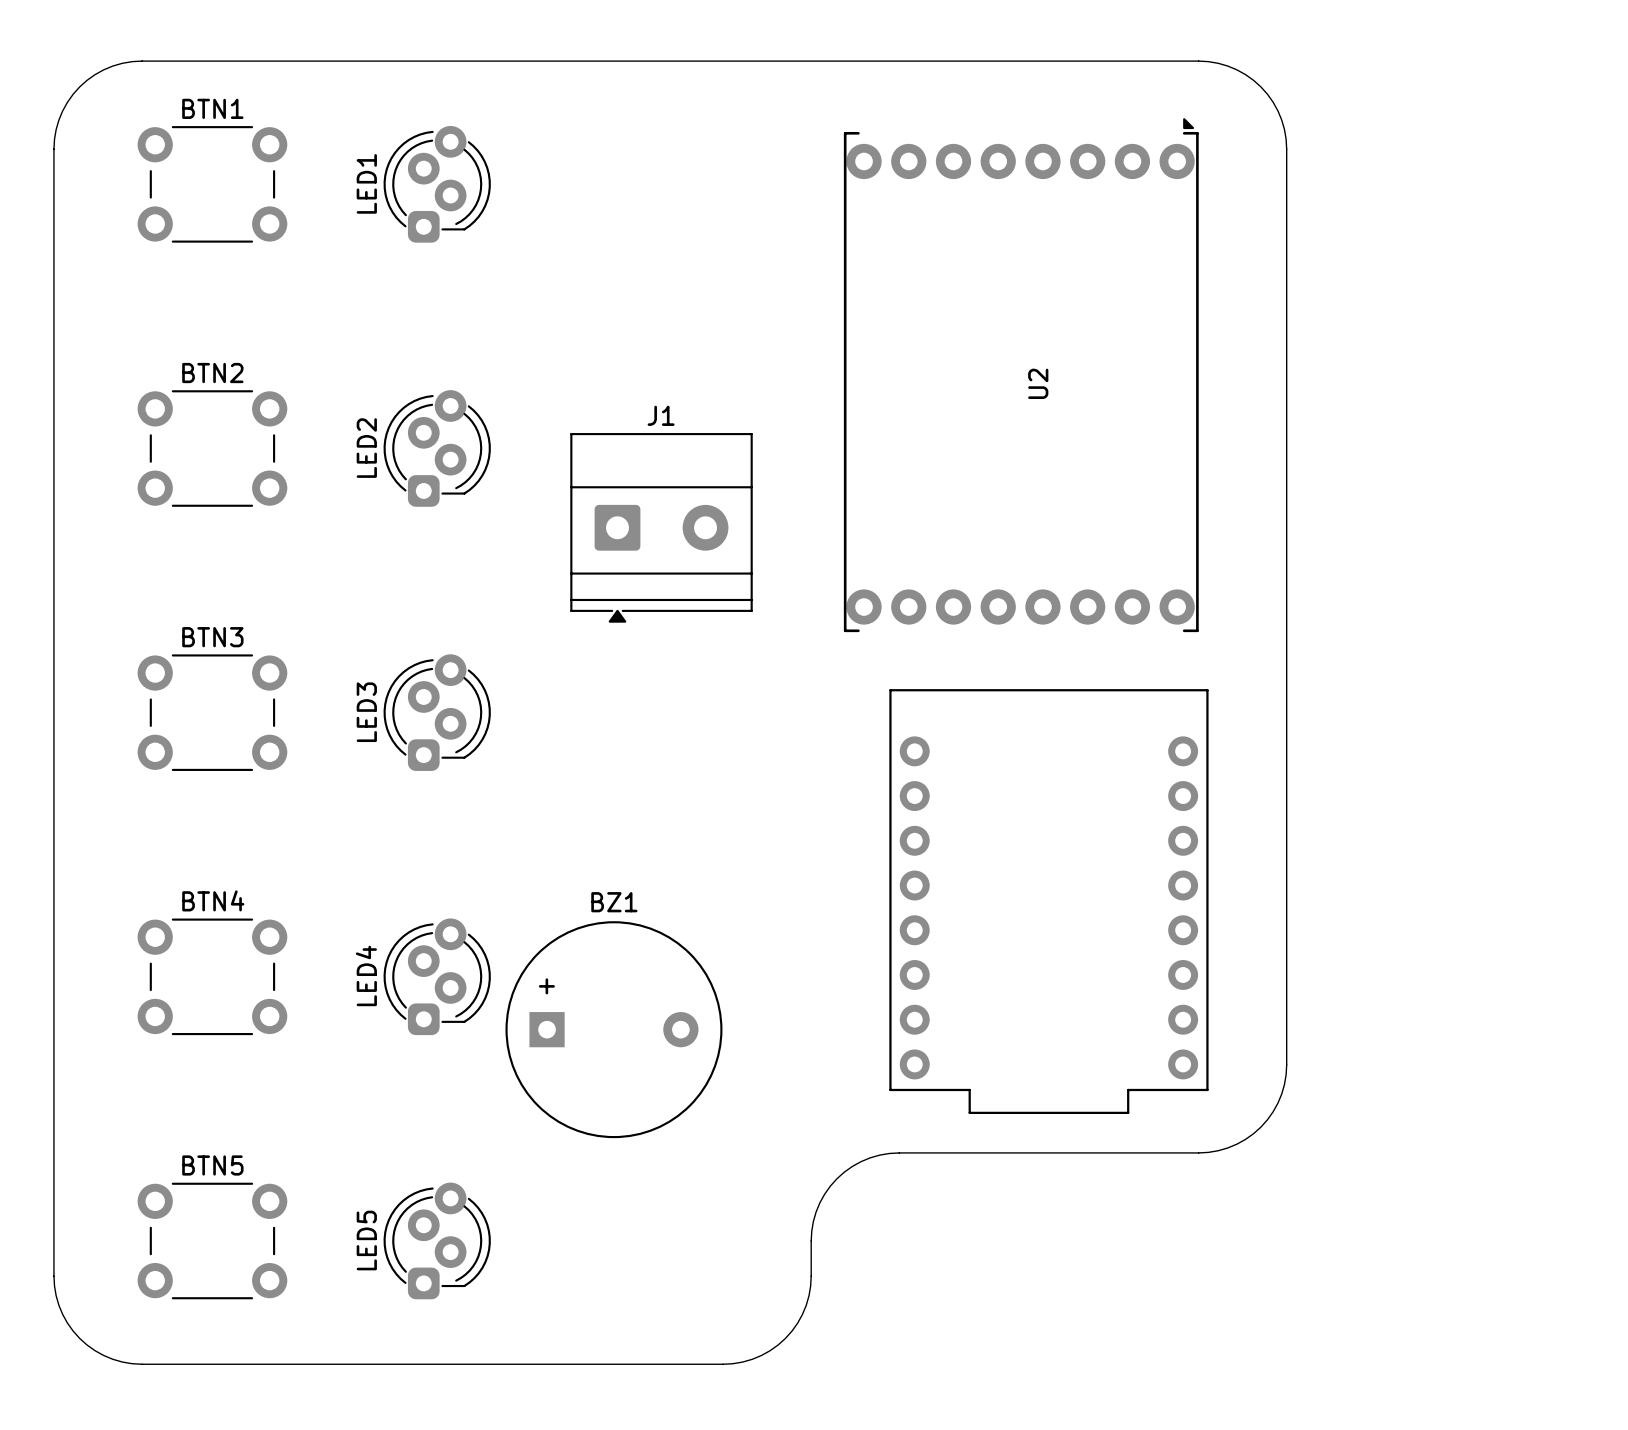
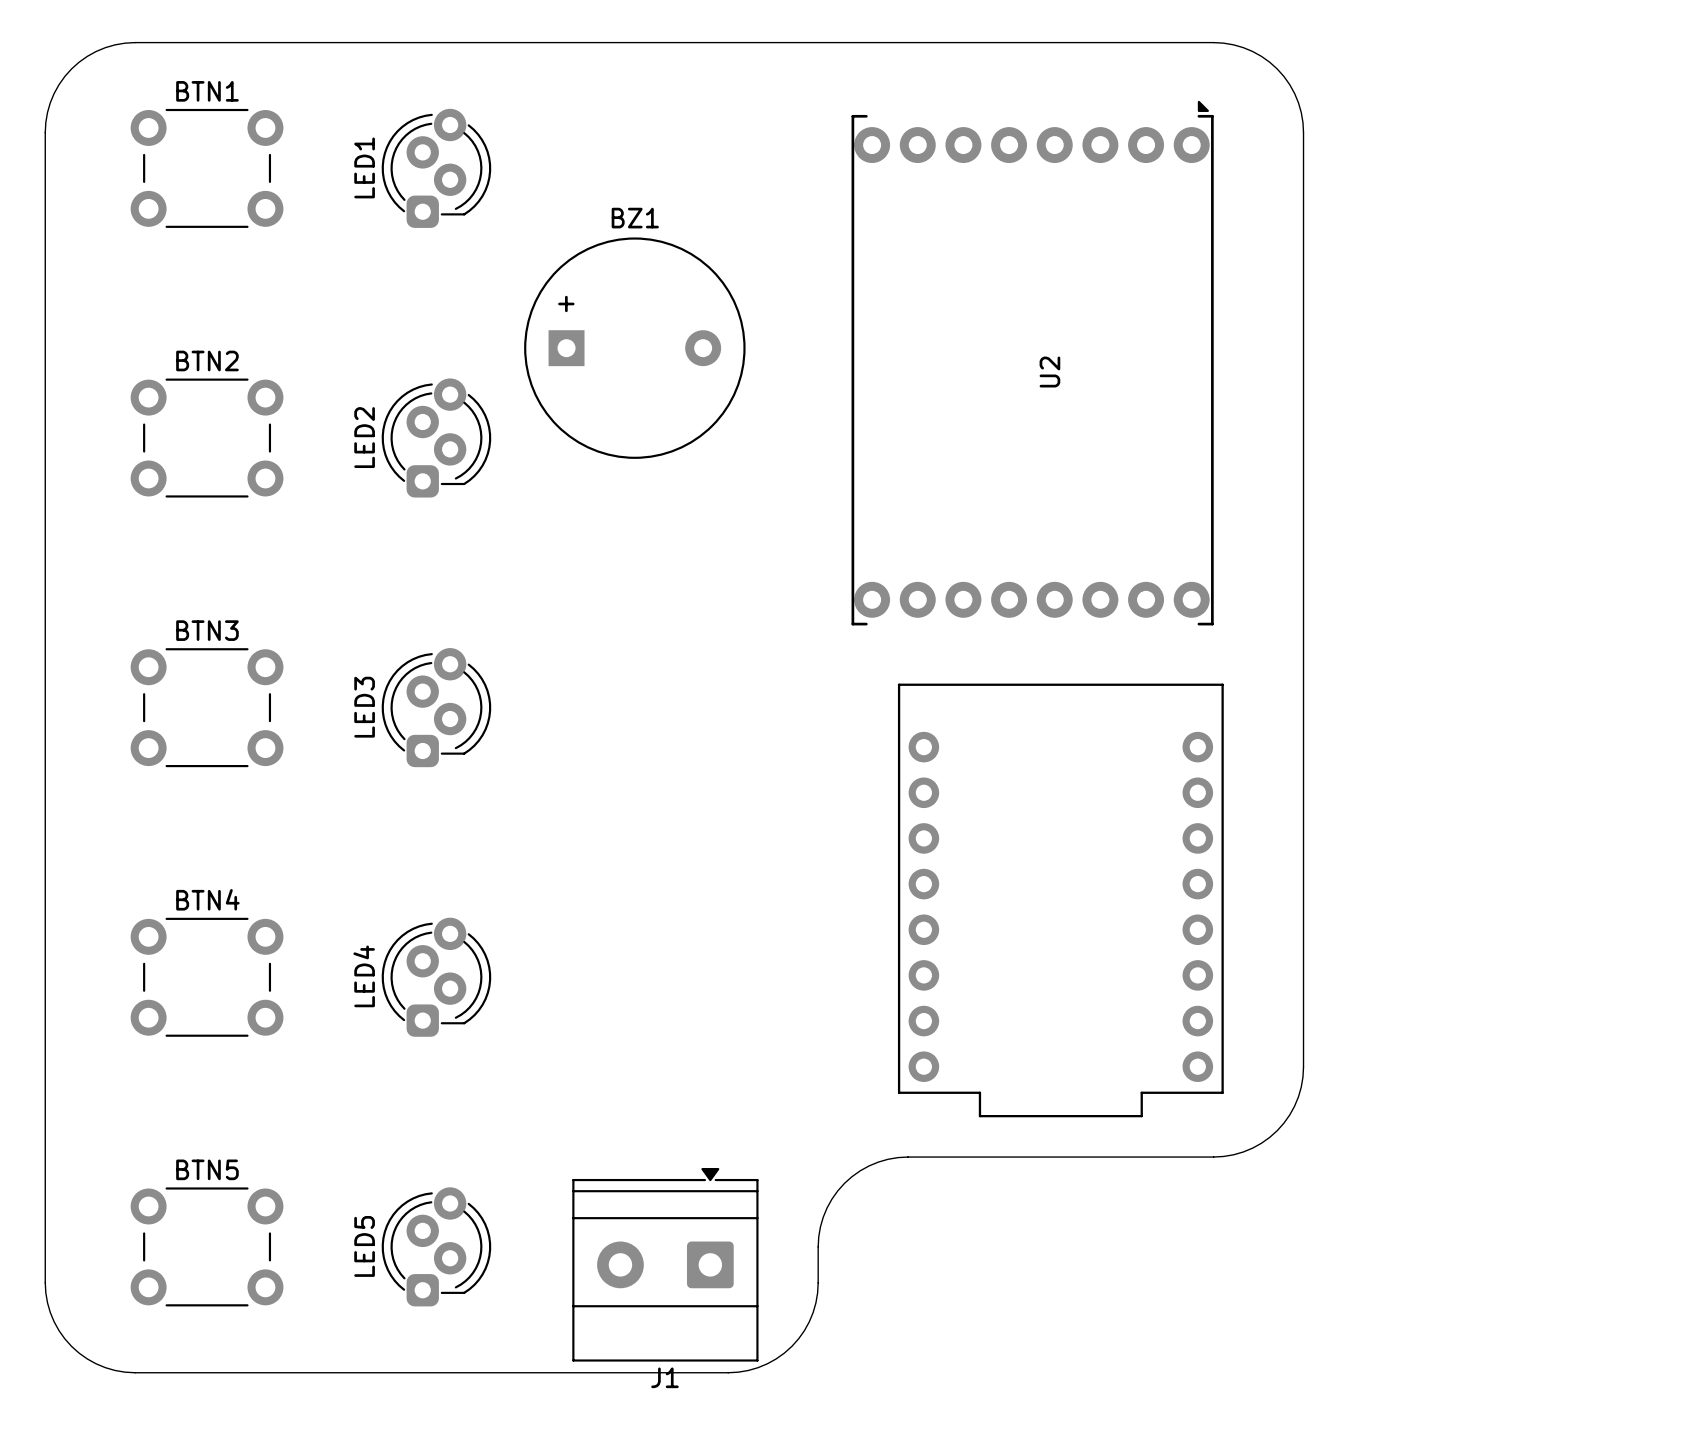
J1 rotation: 0° (661, 527) -> 180° (665, 1264)
J1 position: (661, 527) -> (665, 1264)
BZ1 position: (613, 1029) -> (634, 348)

